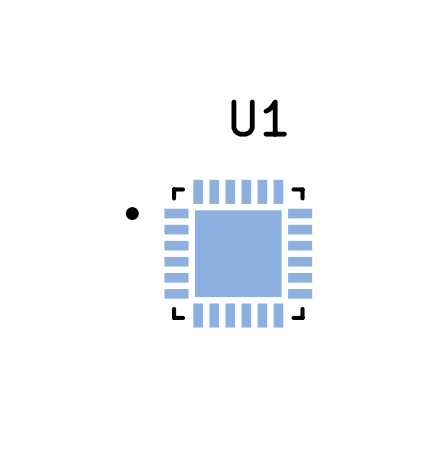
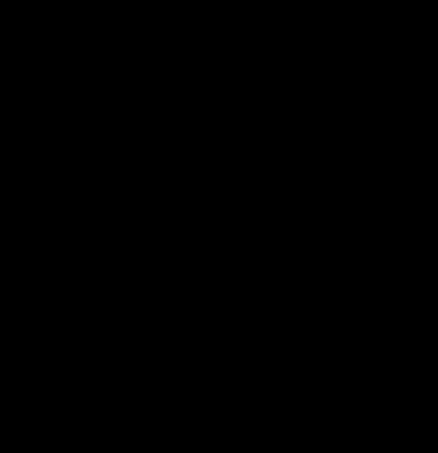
U1: (219, 253) -> none

